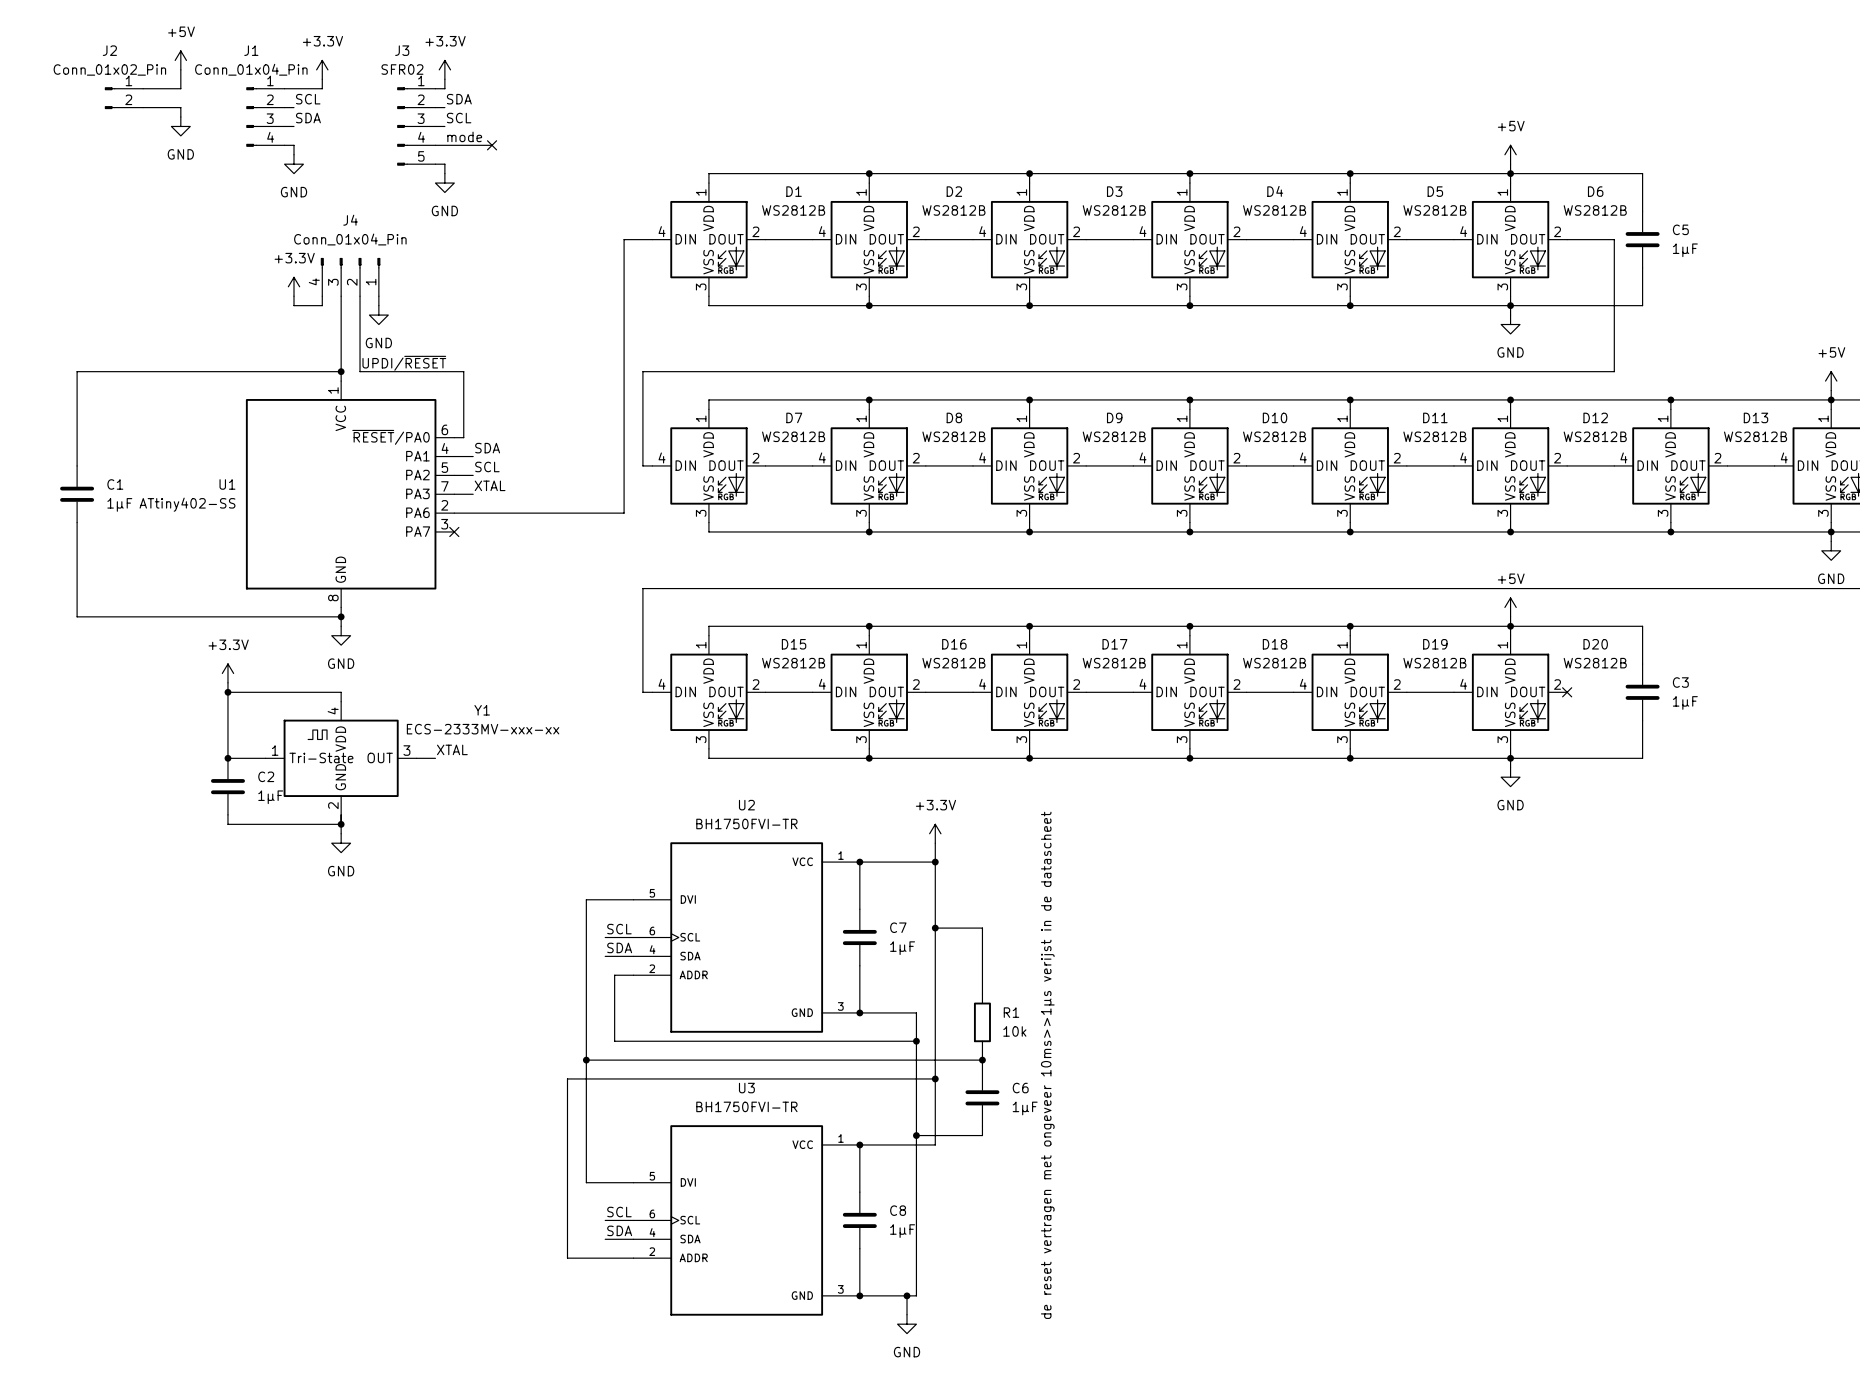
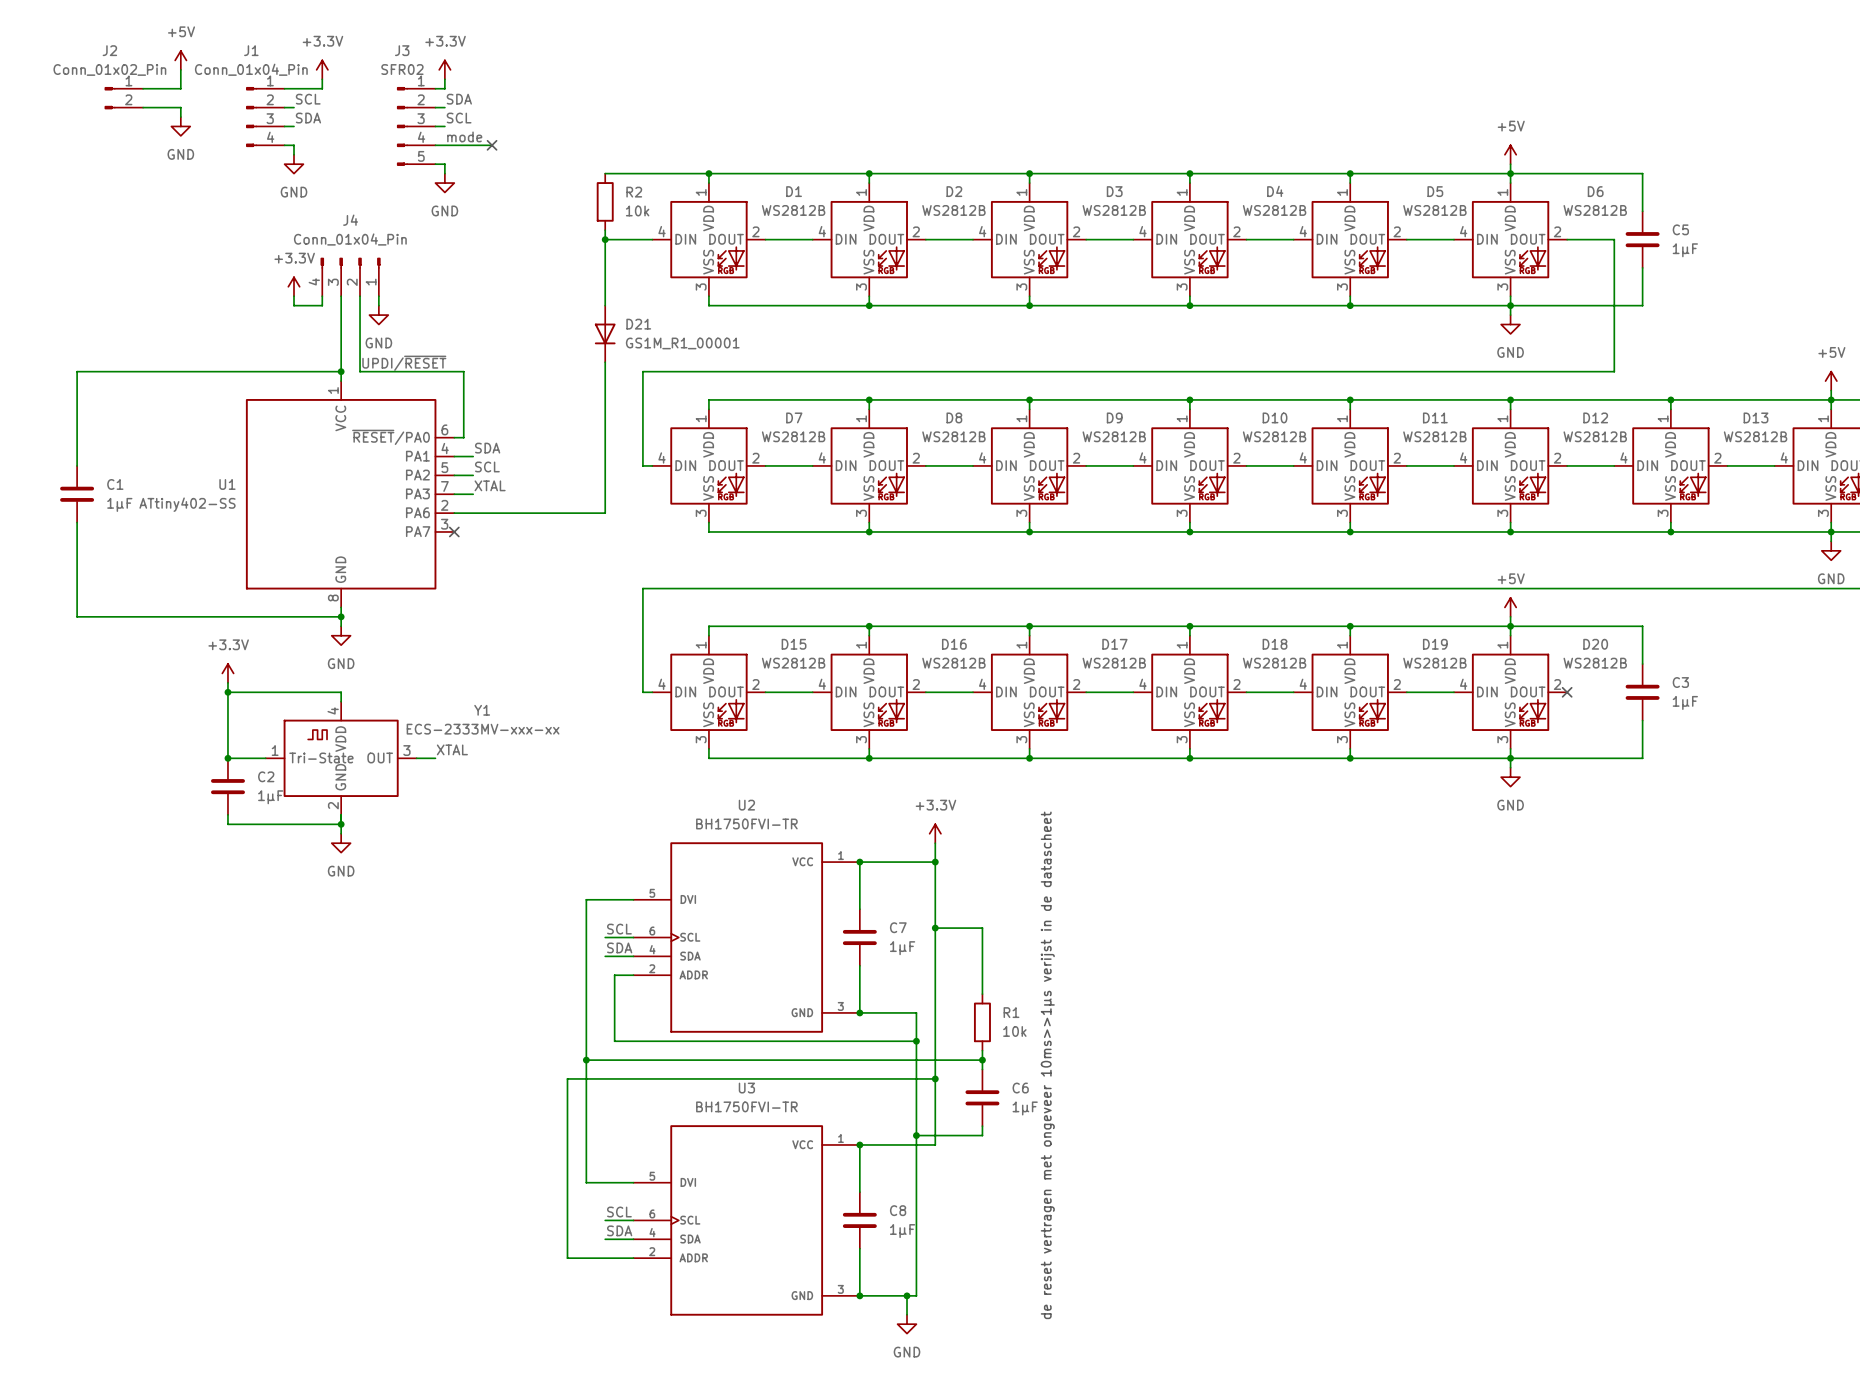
wire: none -> (605, 173) (708, 173)
junction: none -> (708, 173)
R2: none -> 10k (605, 201)
wire: none -> (605, 230) (605, 305)
wire: none -> (605, 239) (624, 239)
junction: none -> (605, 239)
wire: (624, 239) (624, 513) (605, 513) -> (605, 362) (605, 513)
D21: none -> GS1M_R1_00001 (605, 333)

